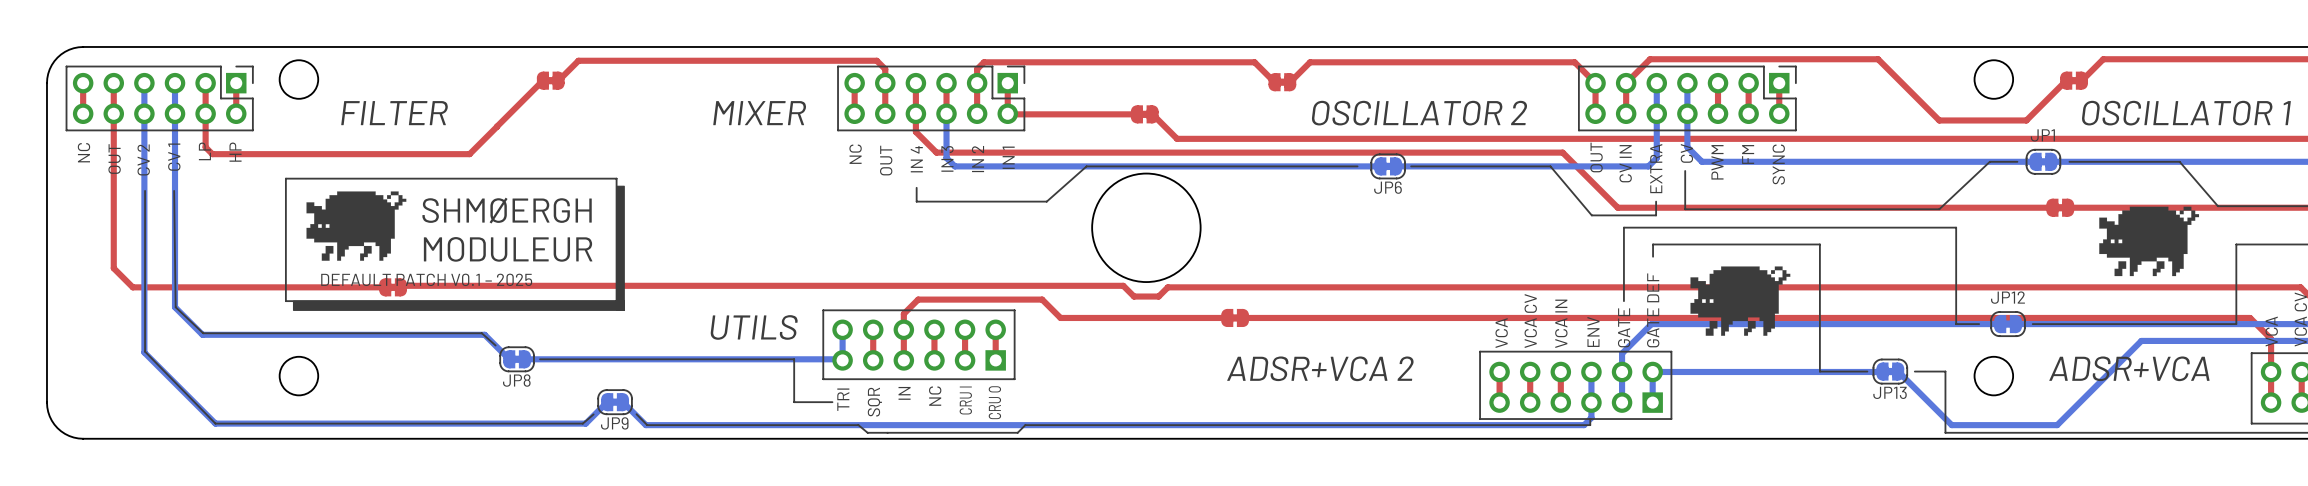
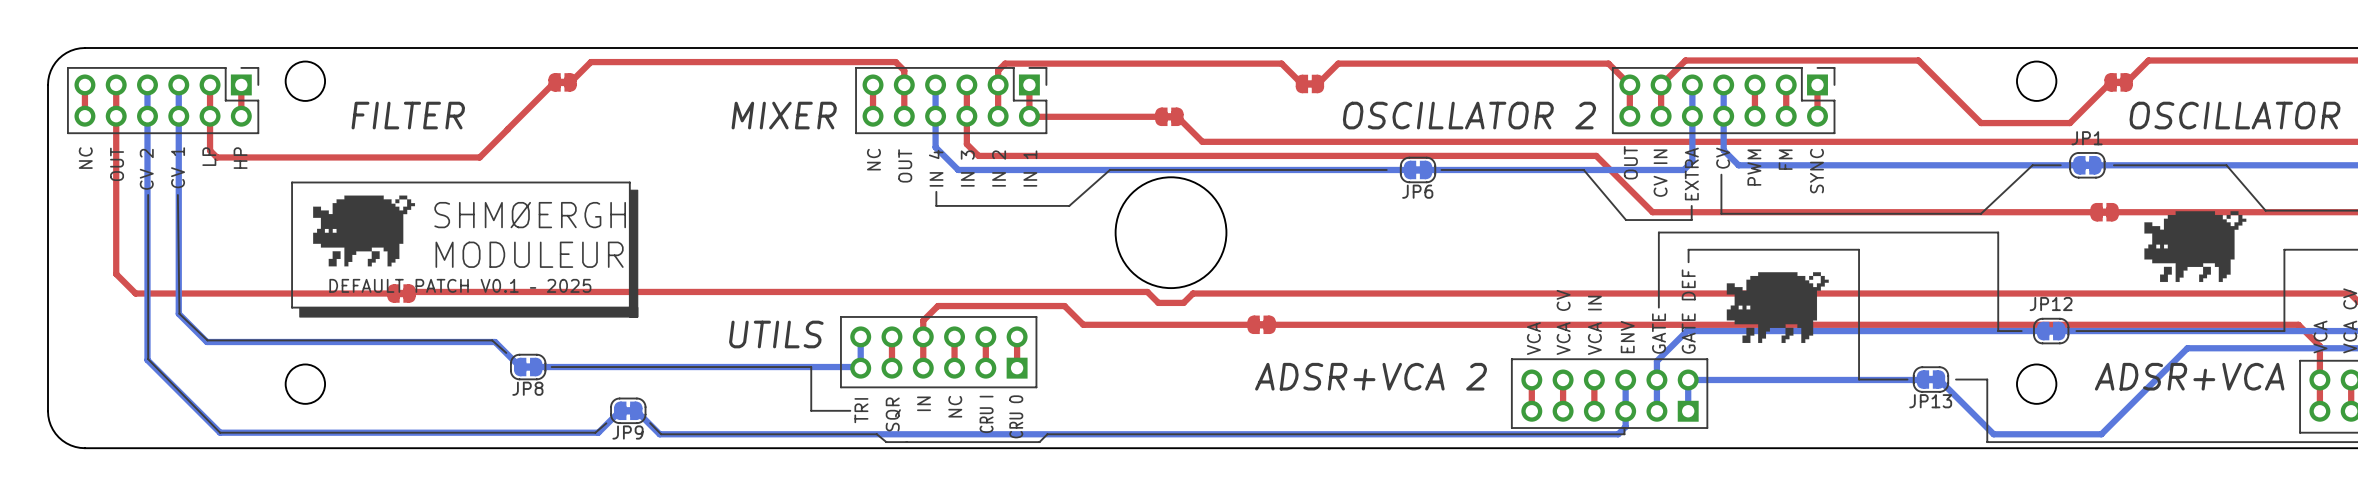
top track: (915, 83) (915, 131) (936, 152) (957, 152) -> (966, 116) (966, 144) (978, 155)
bottom track: (946, 113) (946, 157) (954, 166) -> (935, 84) (935, 147) (958, 169) (975, 169)

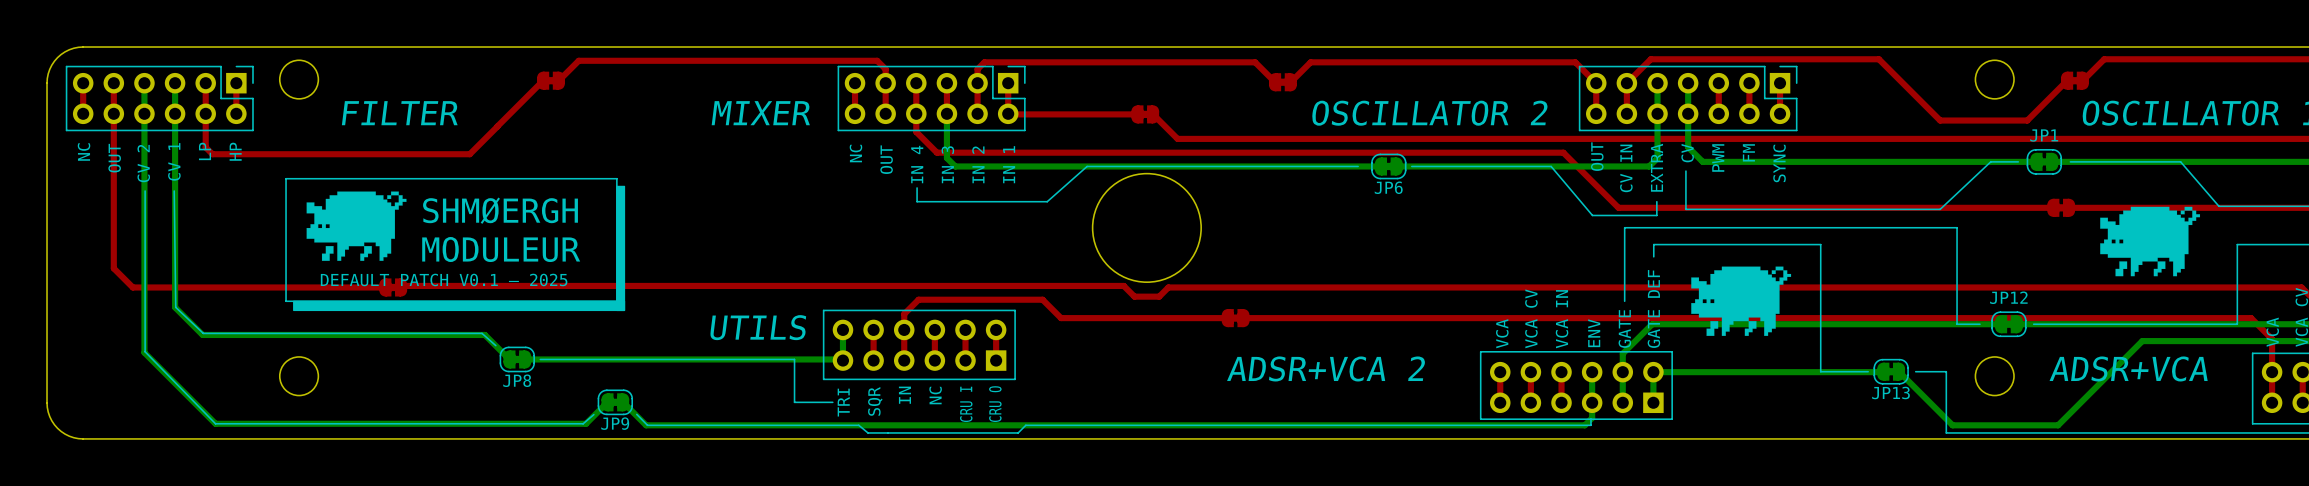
bottom track: (935, 84) (935, 147) (958, 169) (975, 169) -> (946, 113) (946, 158) (955, 166)
top track: (966, 116) (966, 144) (978, 155) -> (916, 83) (916, 132) (936, 152) (958, 152)

